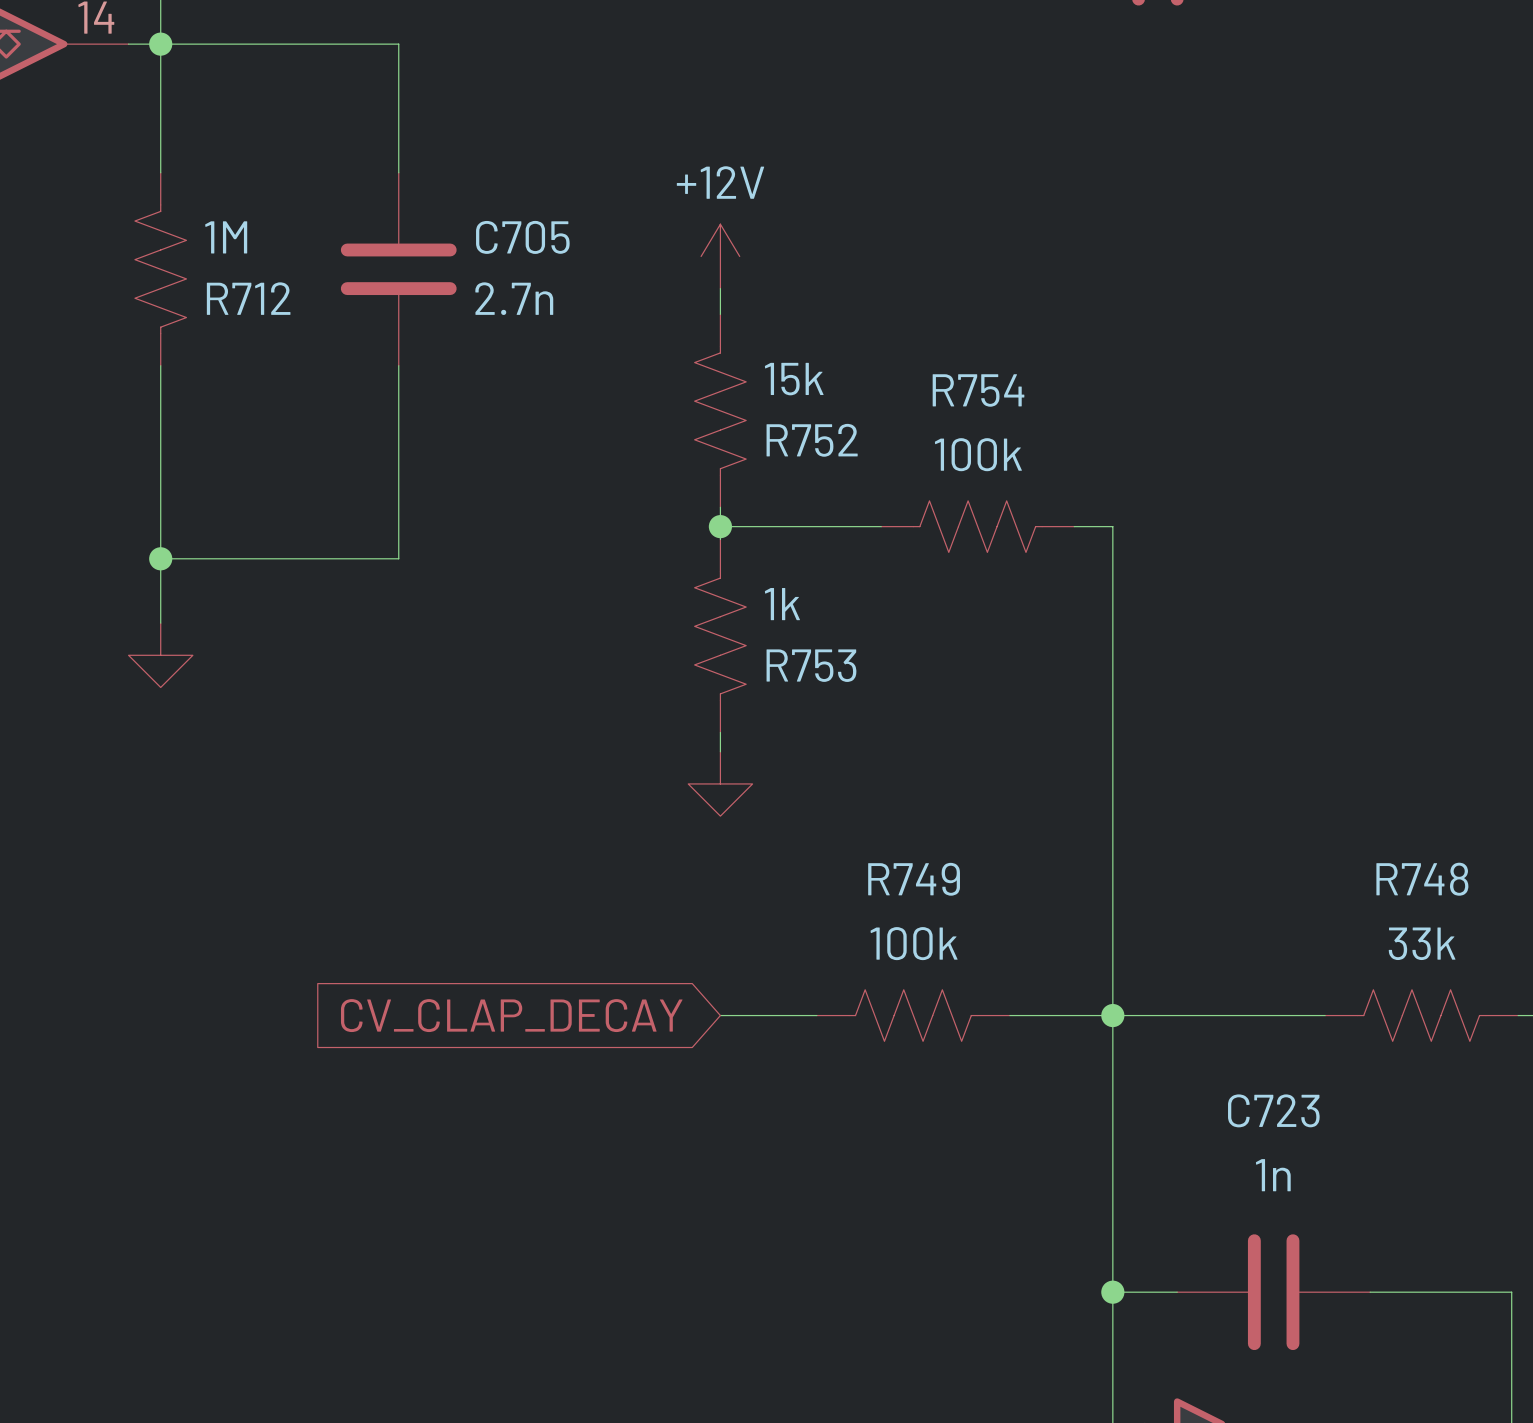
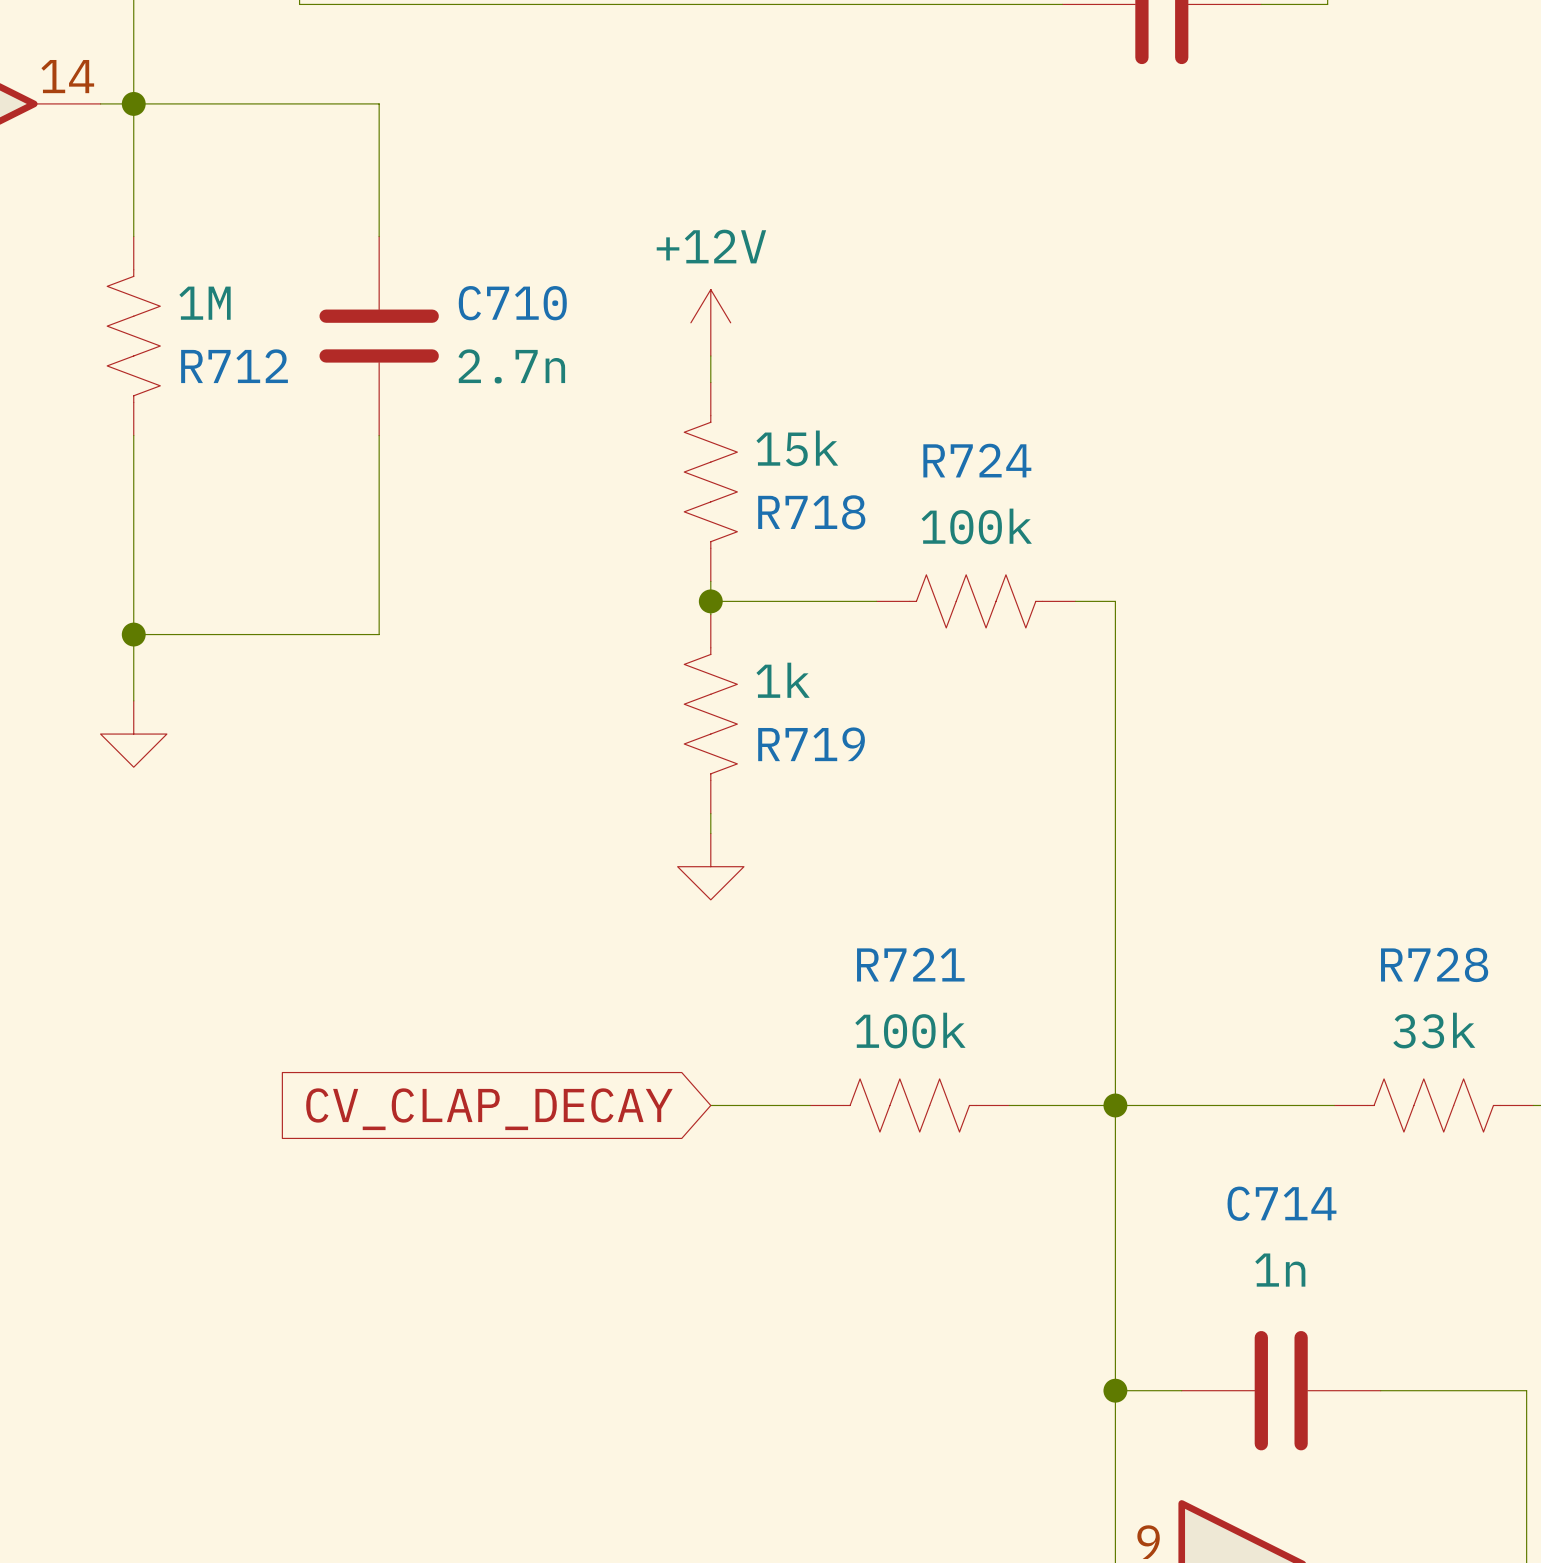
C705 name: C705 (522, 237) -> C710 (512, 303)
R754 name: R754 (978, 390) -> R724 (977, 460)
R752 name: R752 (812, 440) -> R718 (811, 512)
R753 name: R753 (811, 665) -> R719 (811, 744)
R749 name: R749 (914, 879) -> R721 (910, 964)
R748 name: R748 (1422, 879) -> R728 (1434, 964)
C723 name: C723 (1273, 1110) -> C714 (1281, 1203)

